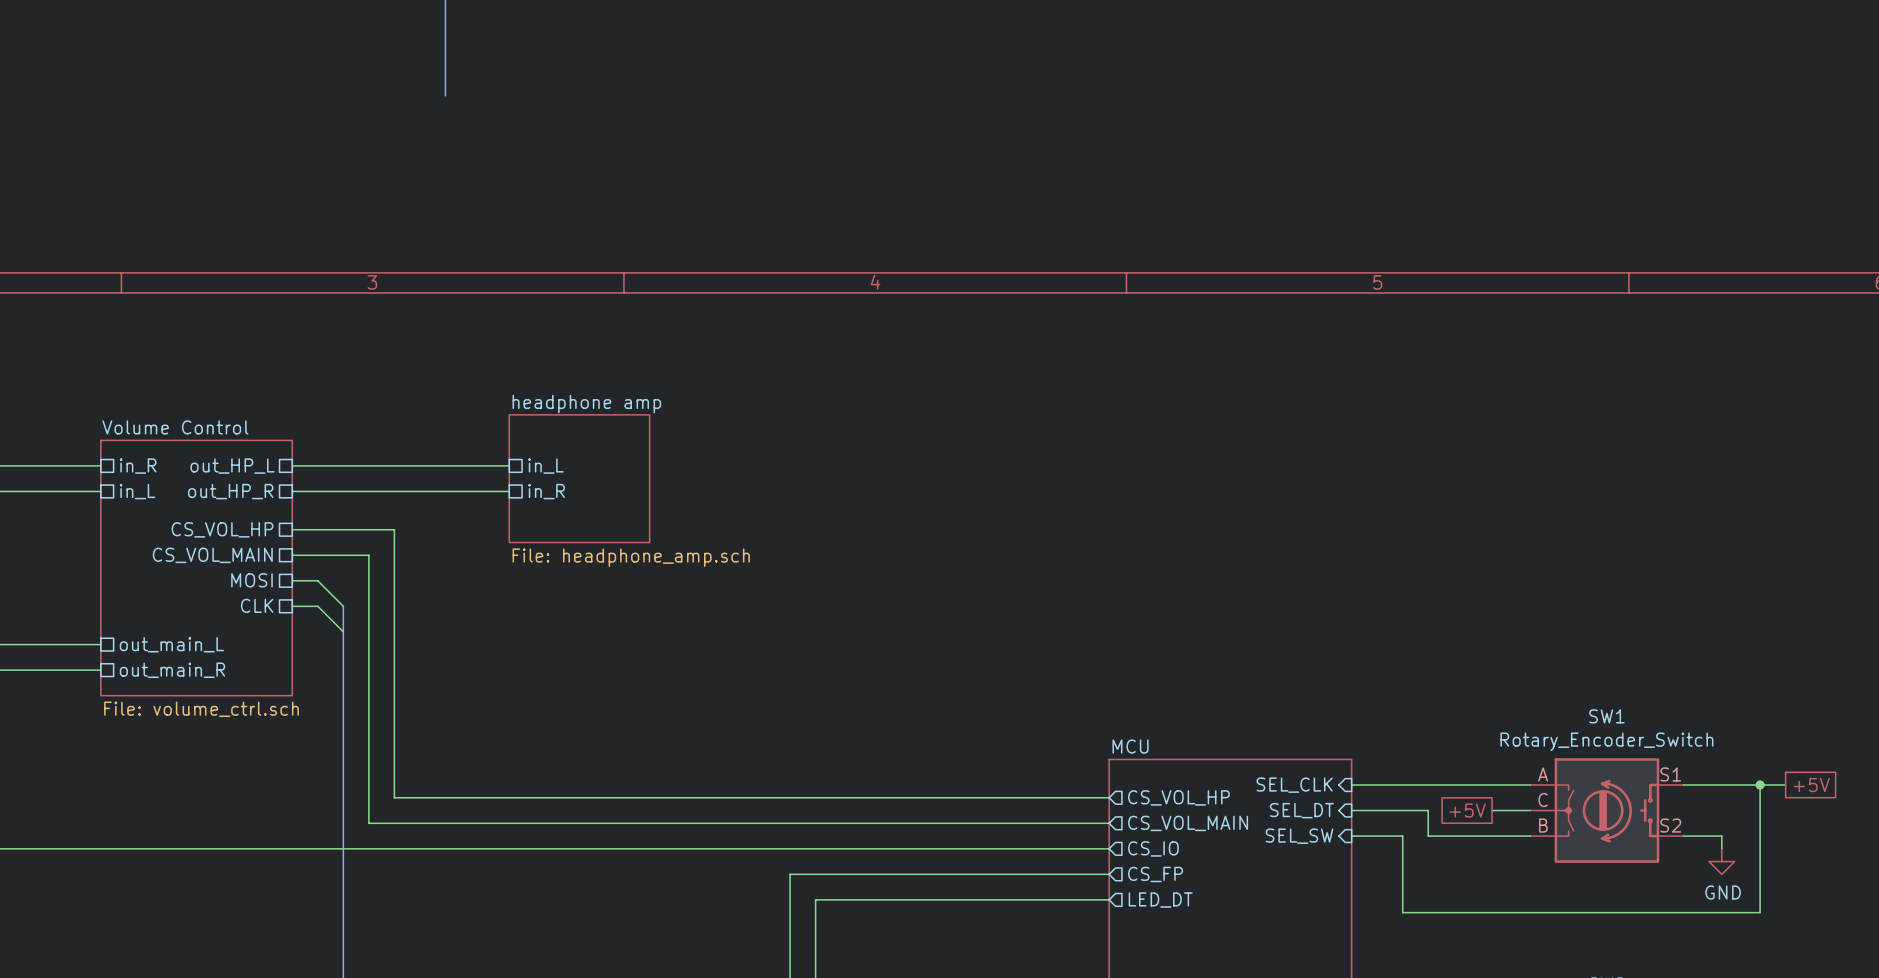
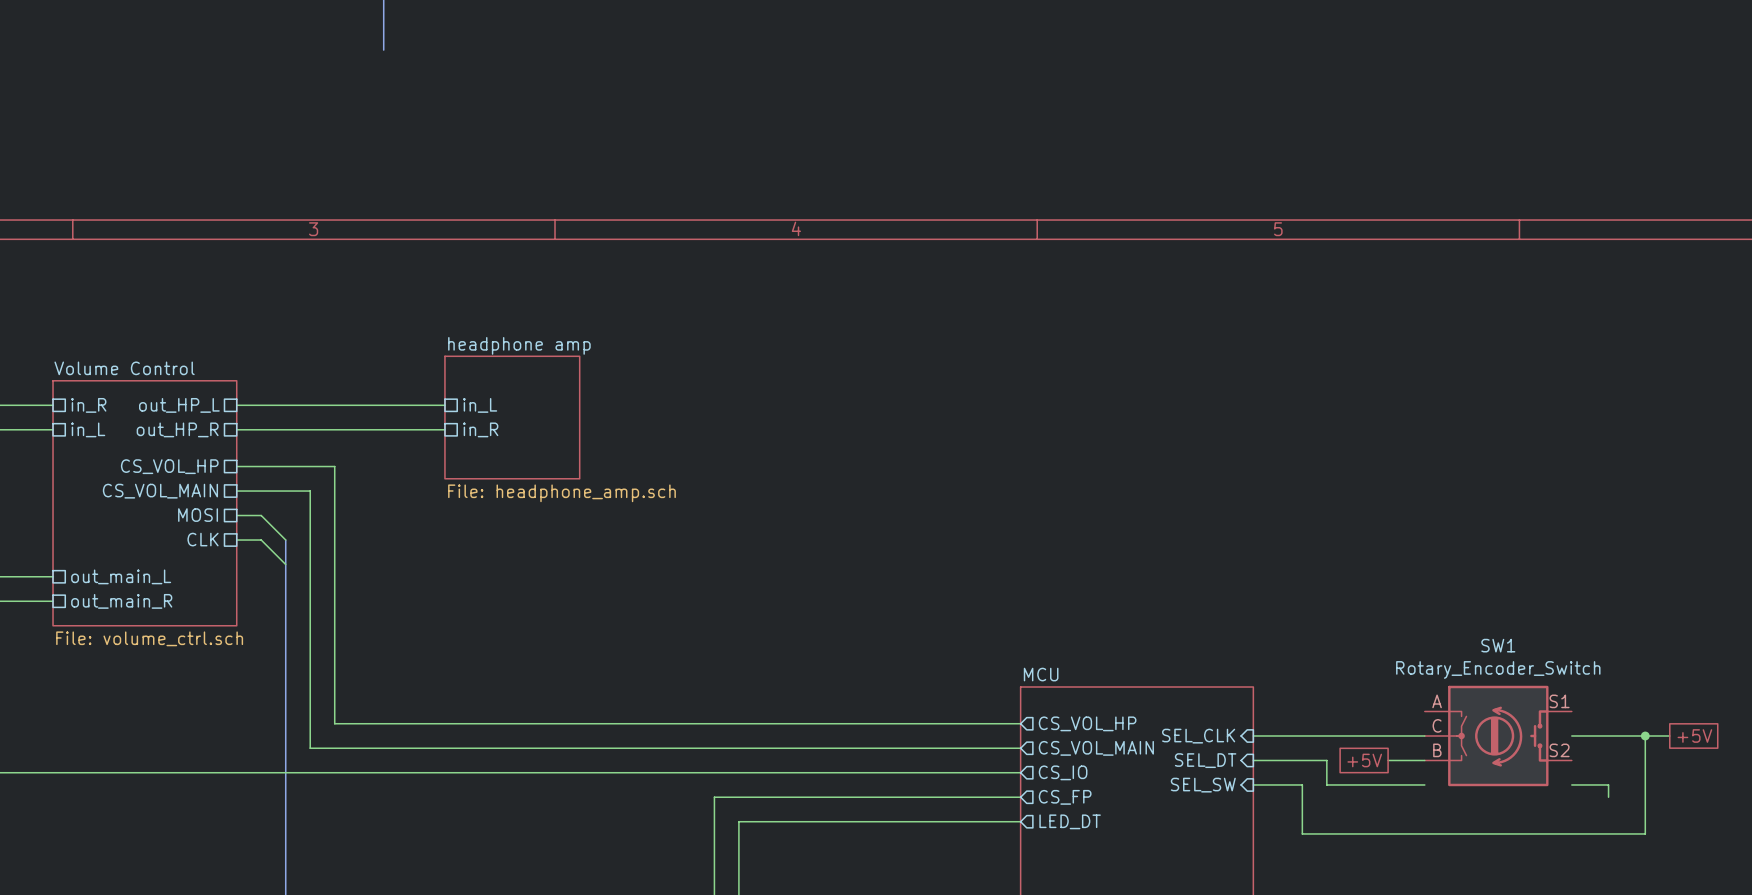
sheet pin: SEL_CLK (1294, 785) -> none
wire: (1351, 785) (1530, 785) -> none
wire: (1683, 785) (1785, 785) -> (1571, 735) (1669, 735)
wire: (1760, 785) (1760, 810) -> none
junction position: (1760, 785) -> (1645, 735)
global label position: +5V (1811, 785) -> +5V (1694, 735)
sheet pin: SEL_DT (1301, 810) -> SEL_CLK (1198, 736)
wire: (1428, 810) (1428, 836) (1492, 836) -> (1326, 735) (1388, 735)
global label position: +5V (1467, 810) -> +5V (1364, 760)
sheet pin: SEL_SW (1299, 836) -> SEL_DT (1205, 760)
wire: (1402, 836) (1402, 861) -> (1253, 784) (1302, 784)
wire: none -> (1302, 760) (1326, 760) (1326, 784) (1424, 784)
wire: (1683, 836) (1721, 836) (1721, 848) -> (1571, 784) (1608, 784) (1608, 797)
sheet pin: none -> SEL_SW (1203, 785)
power symbol: GND (1721, 861) -> none

